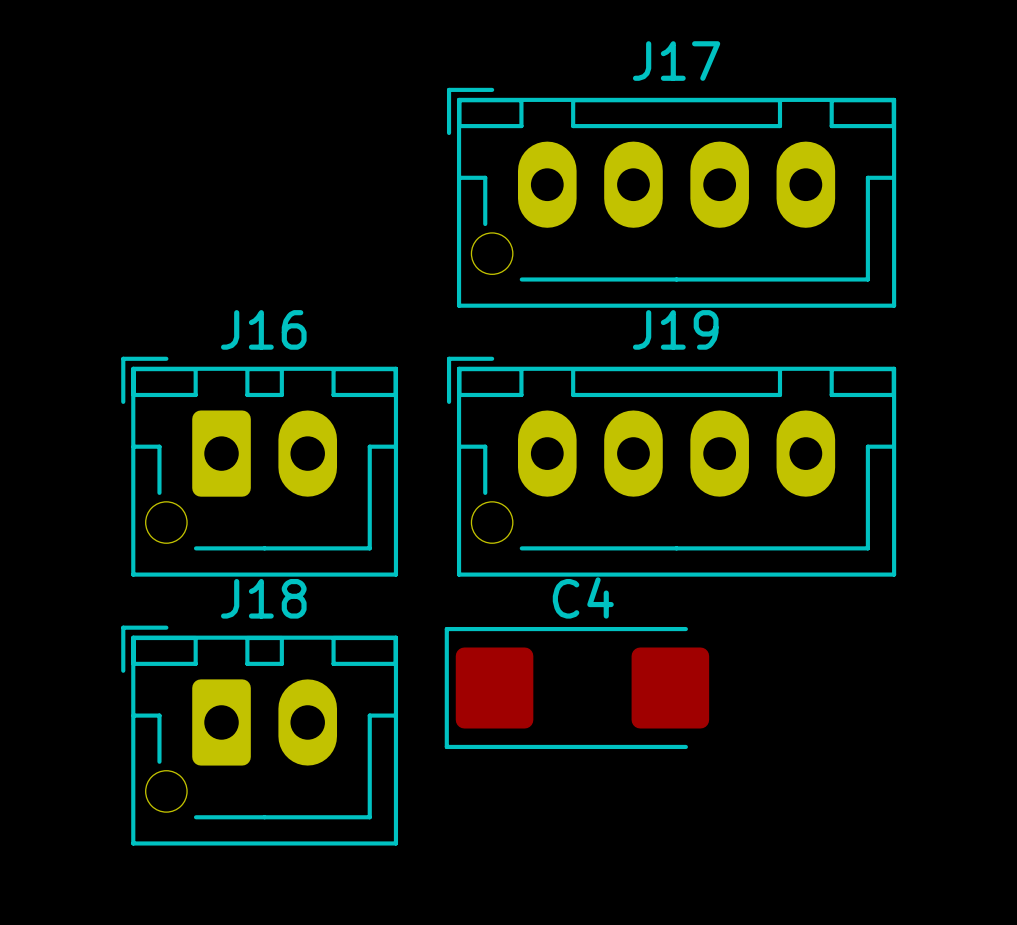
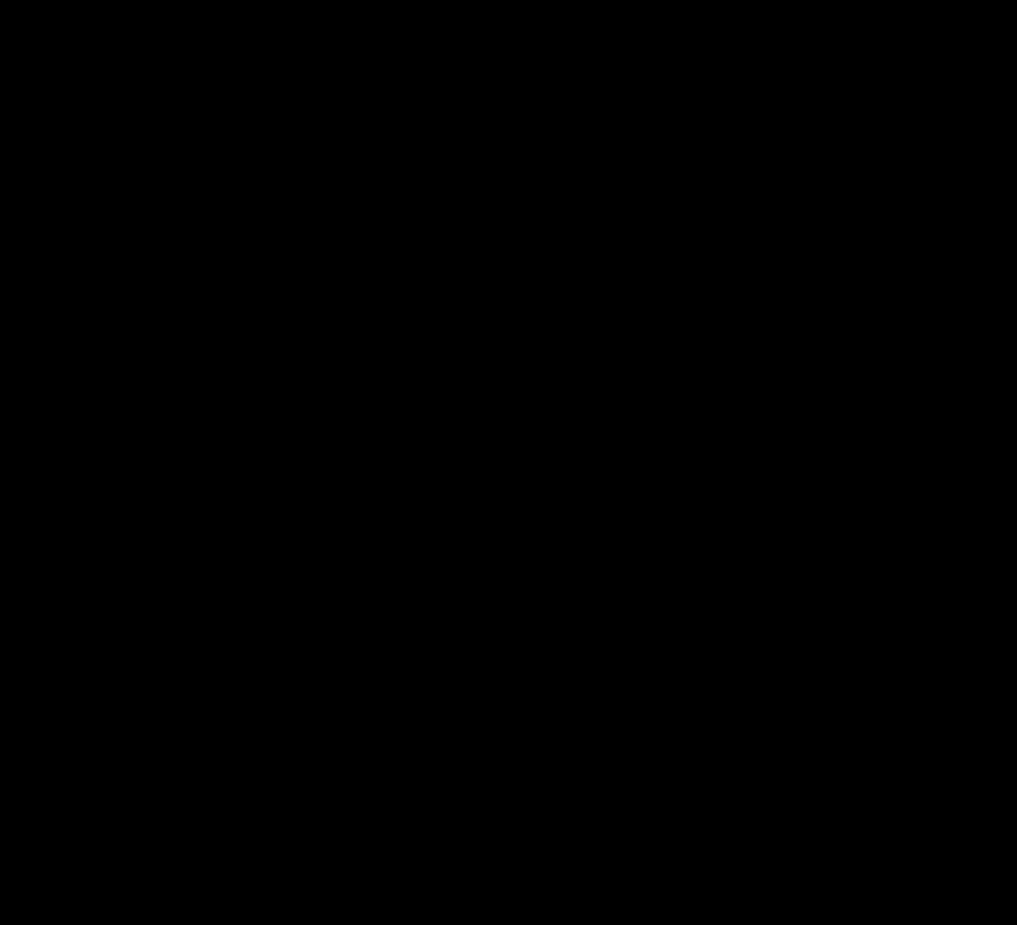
J17: (671, 197) -> none
J16: (259, 466) -> none
J19: (671, 466) -> none
C4: (576, 688) -> none
J18: (259, 735) -> none

